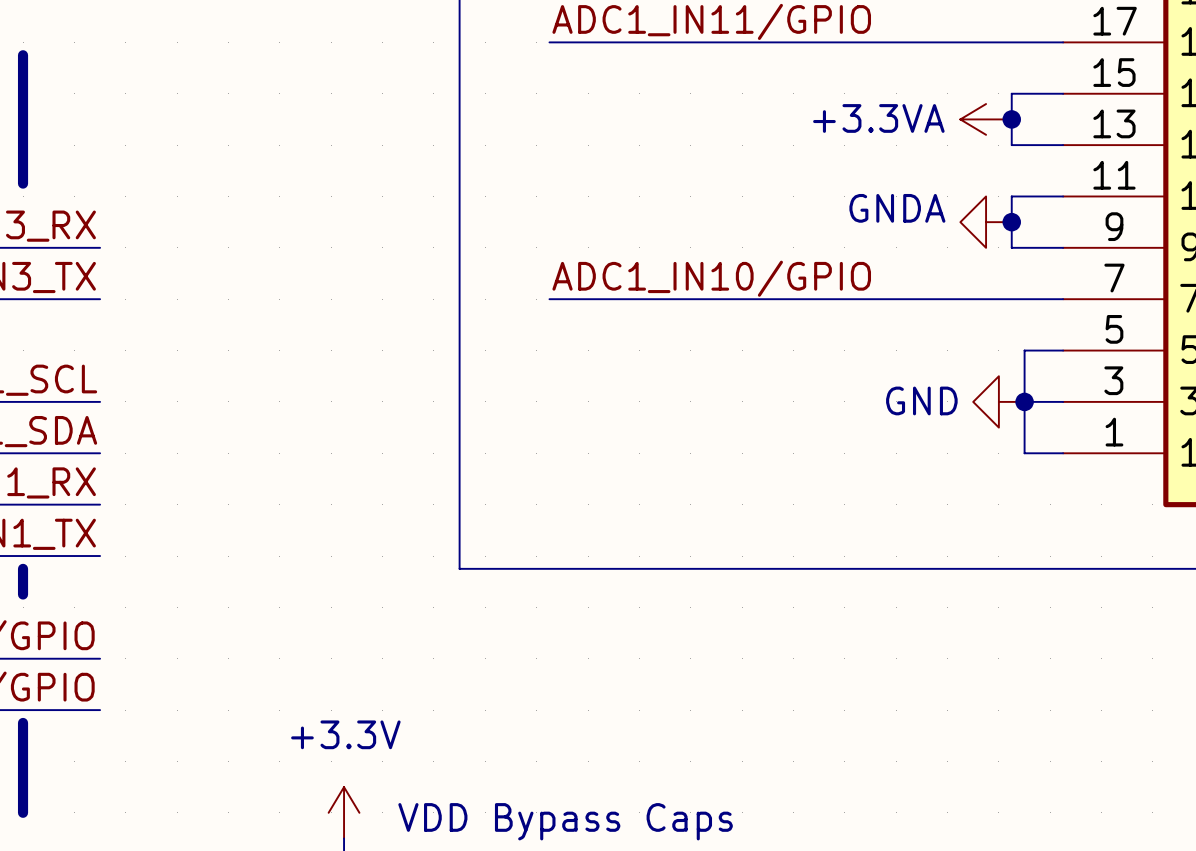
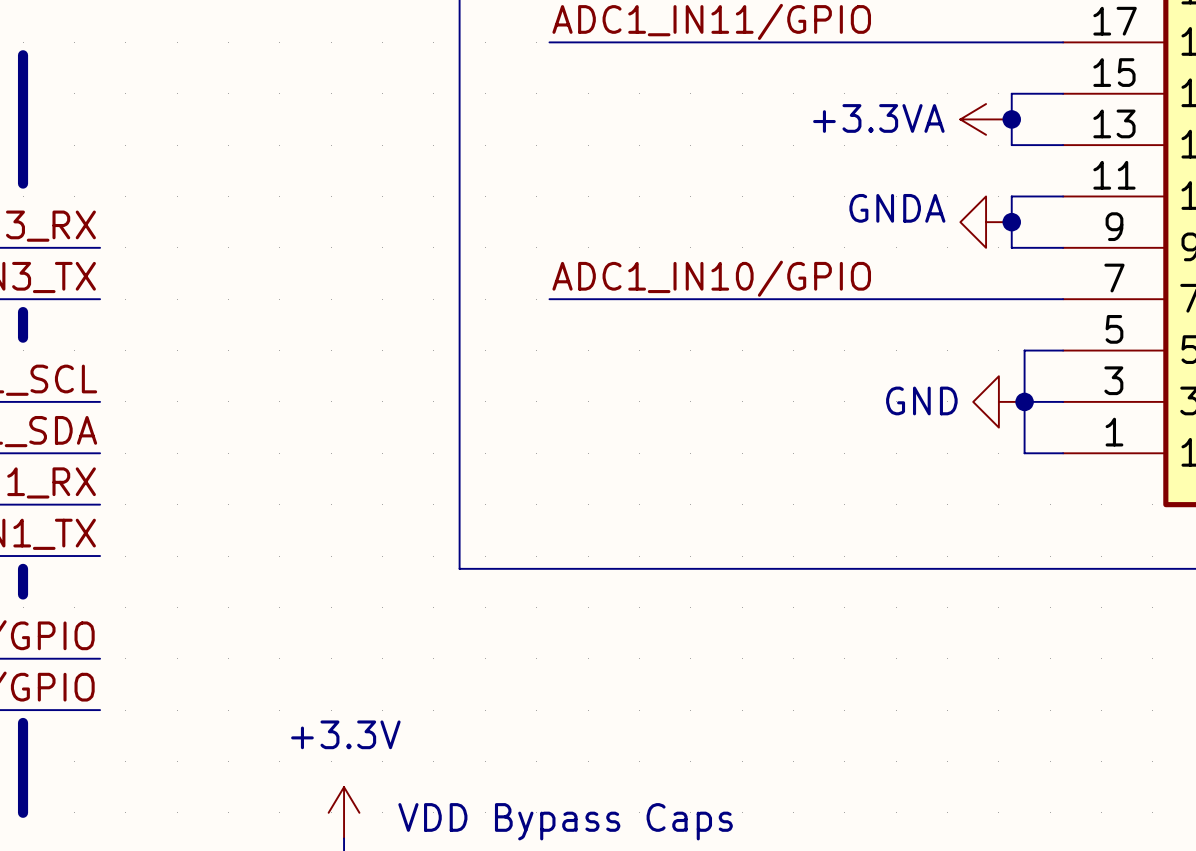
line: none -> (23, 312) (23, 337)

